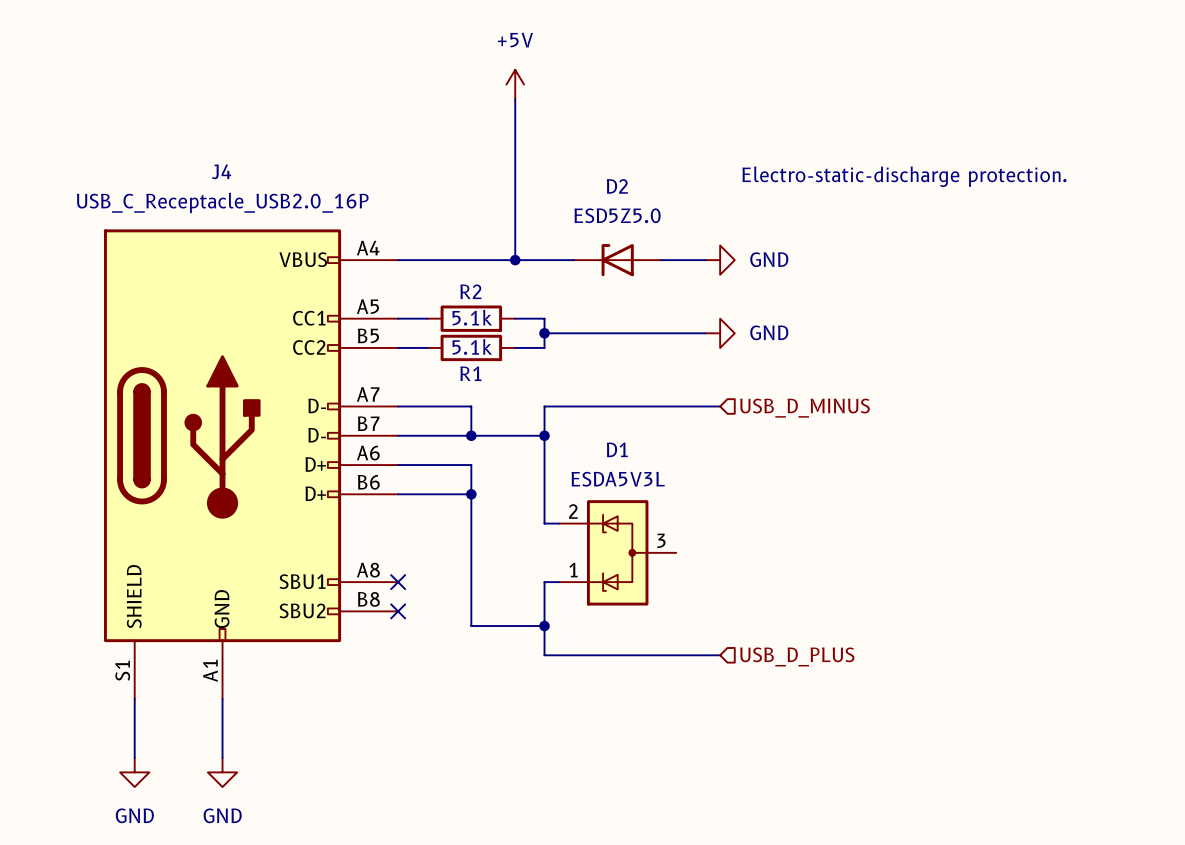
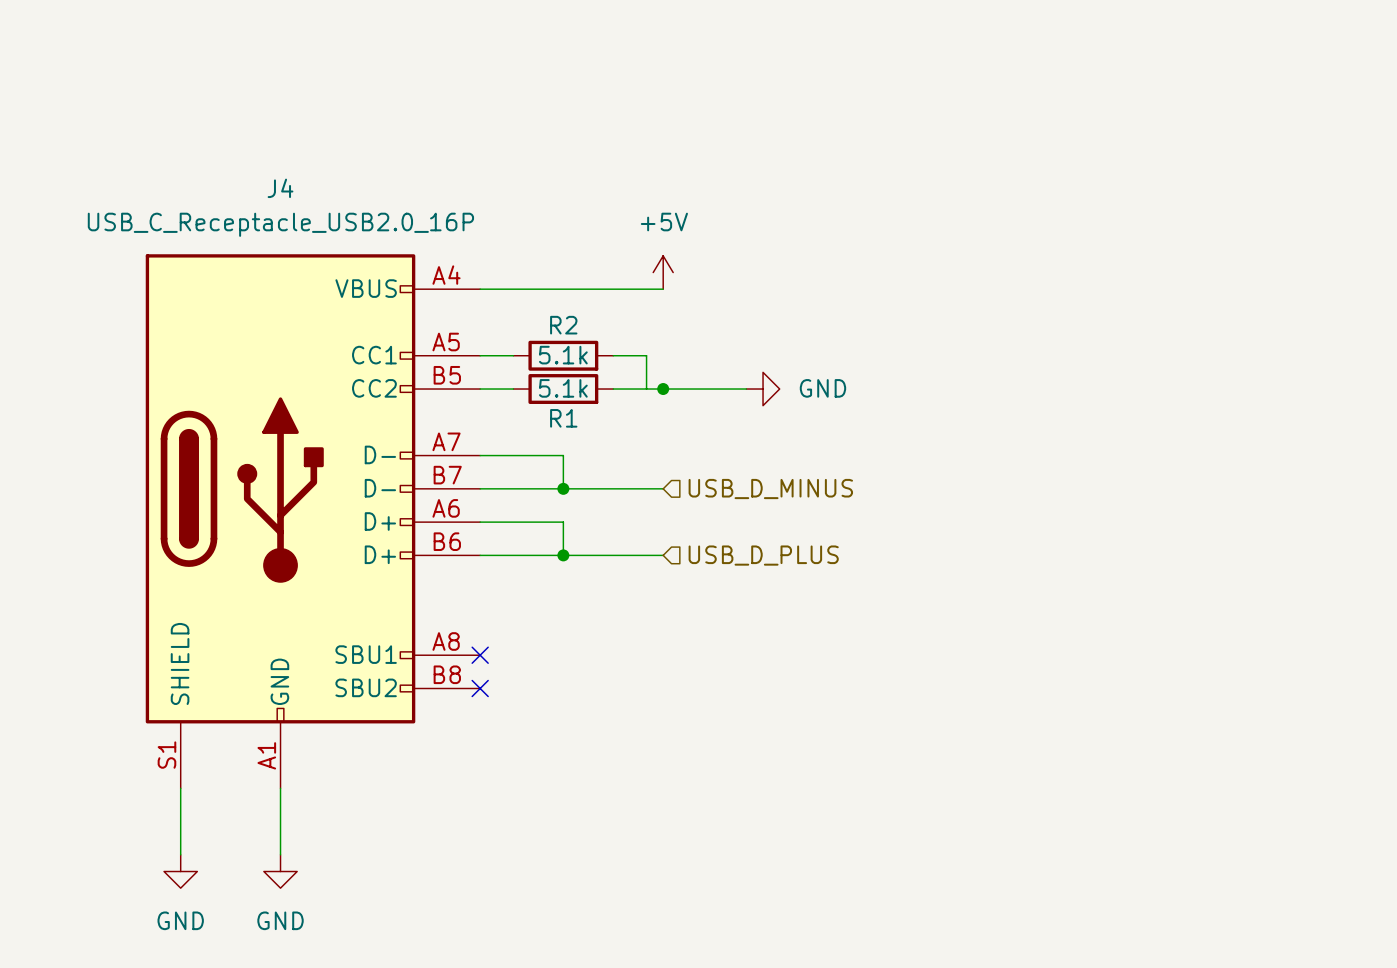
power symbol position: +5V (515, 84) -> +5V (663, 272)
wire: (515, 99) (515, 260) -> none
text: Electro-static-discharge protection. (904, 176) -> none
junction: (515, 260) -> none
wire: (559, 260) (573, 260) -> (646, 488) (663, 488)
D2: ESD5Z5.0 (617, 260) -> none
wire: (661, 260) (705, 260) -> none
power symbol: GND (720, 260) -> none
wire: (544, 333) (705, 333) -> none
junction position: (544, 333) -> (663, 389)
power symbol: GND (720, 333) -> none
wire: none -> (646, 389) (746, 389)
power symbol: none -> GND (763, 389)
wire: (720, 406) (544, 406) (544, 523) (559, 523) -> none
hierarchical label position: USB_D_MINUS (804, 408) -> USB_D_MINUS (770, 489)
junction: (544, 435) -> none
wire: (471, 494) (471, 626) (544, 626) -> (563, 555) (663, 555)
D1: ESDA5V3L (617, 552) -> none
wire: (559, 582) (544, 582) (544, 655) (720, 655) -> none
junction: (544, 626) -> none
hierarchical label position: USB_D_PLUS (797, 656) -> USB_D_PLUS (763, 555)

